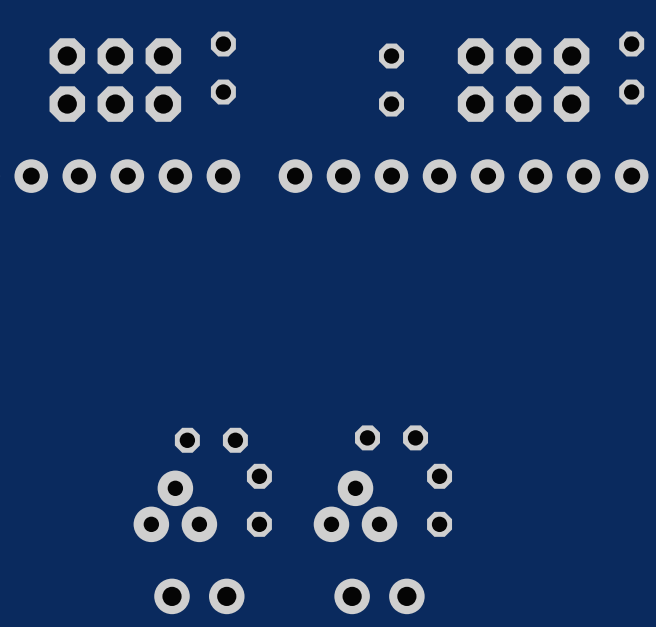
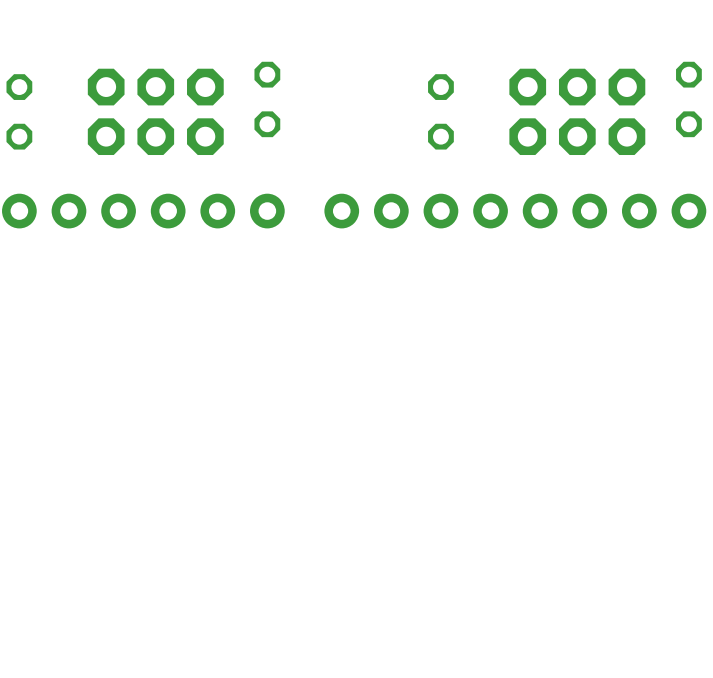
part: (391, 437) -> none
part: (211, 440) -> none
part: (259, 500) -> none
part: (439, 500) -> none
part: (175, 506) -> none
part: (355, 506) -> none
part: (199, 596) -> none
part: (379, 596) -> none

